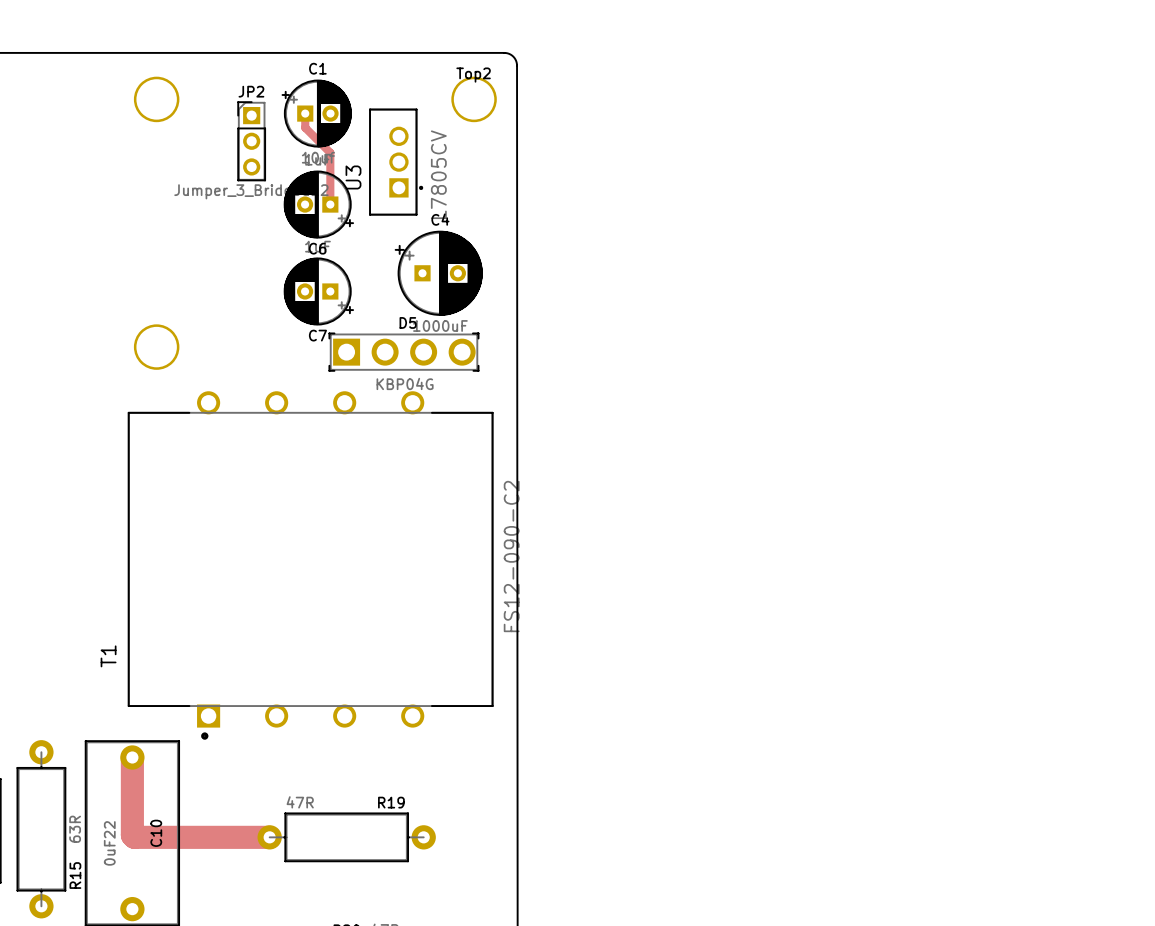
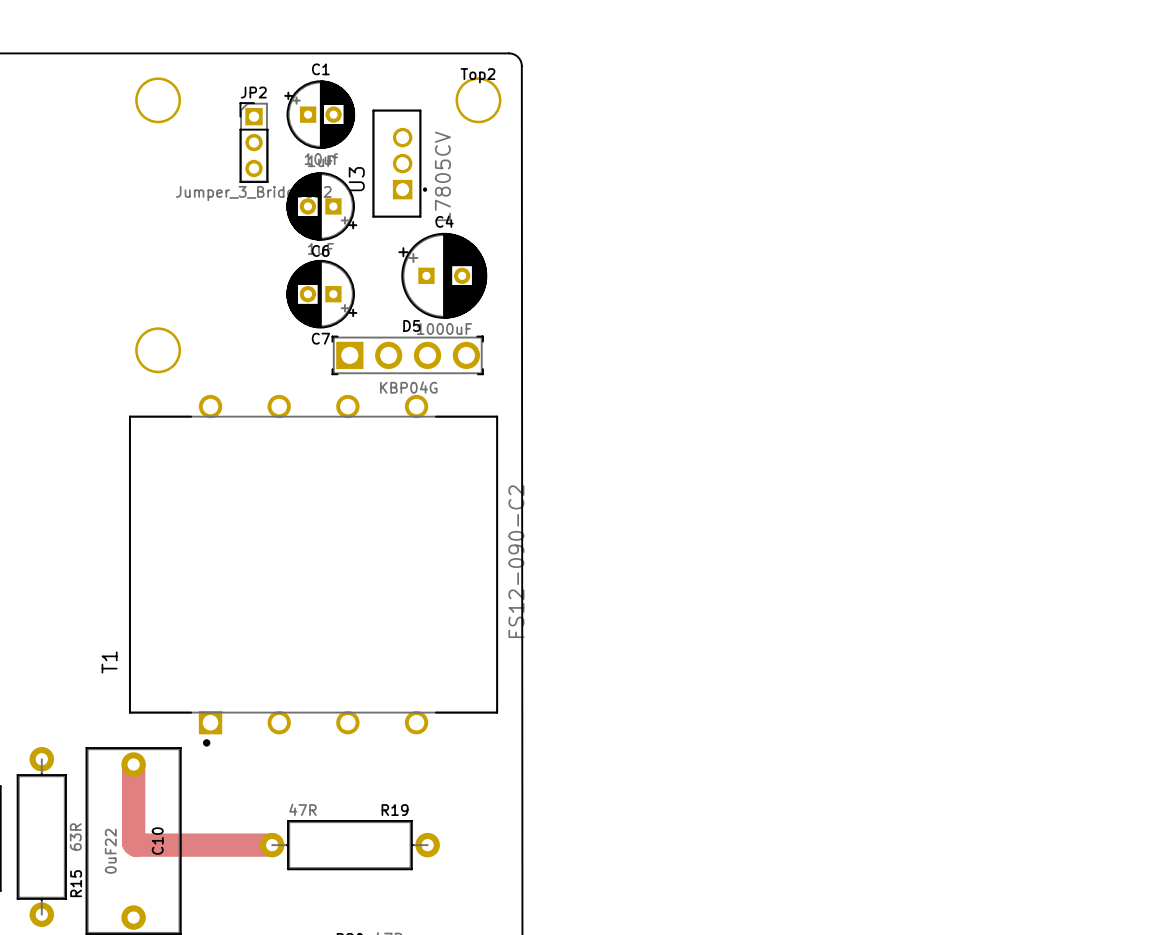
track: (305, 113) (305, 127) (330, 152) (330, 204) -> none

